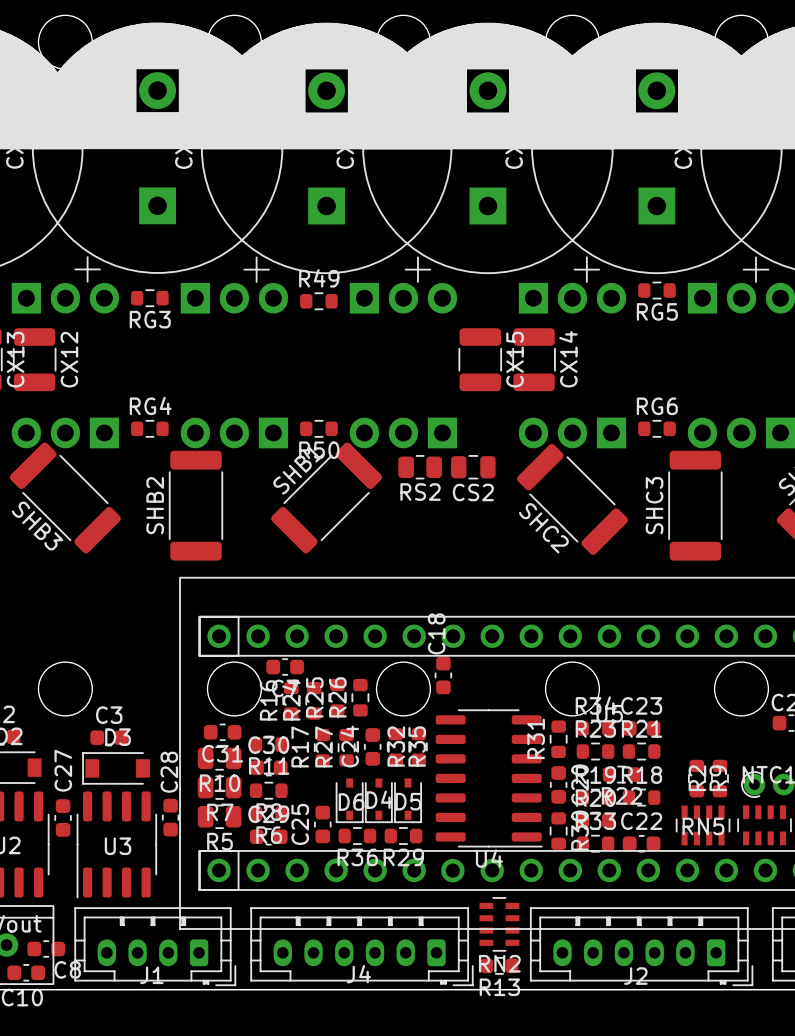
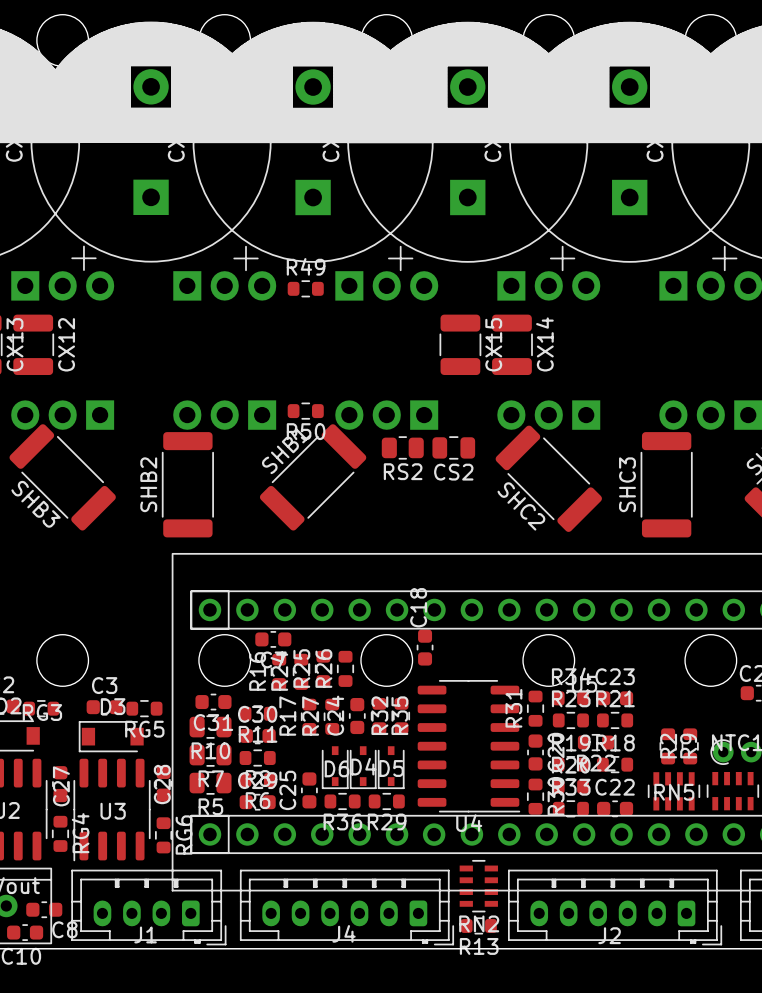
RG5 position: (656, 290) -> (144, 708)
RG3 position: (149, 298) -> (41, 708)
RG3 name position: RG3 (150, 319) -> RG3 (42, 712)
RG4 rotation: 0° (149, 428) -> 90° clockwise (60, 833)
RG4 position: (149, 428) -> (60, 833)
RG6 rotation: 0° (656, 428) -> 90° clockwise (163, 835)
RG6 position: (656, 428) -> (163, 835)
C27 name position: C27 (63, 770) -> C27 (61, 786)
C28 name position: C28 (169, 772) -> C28 (162, 784)

